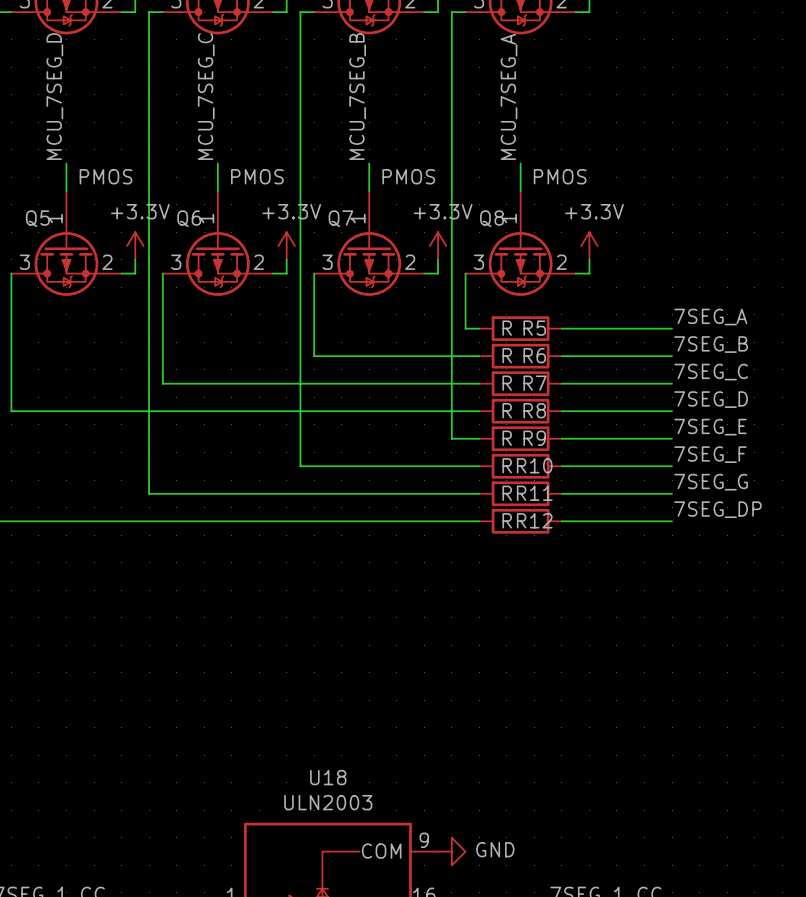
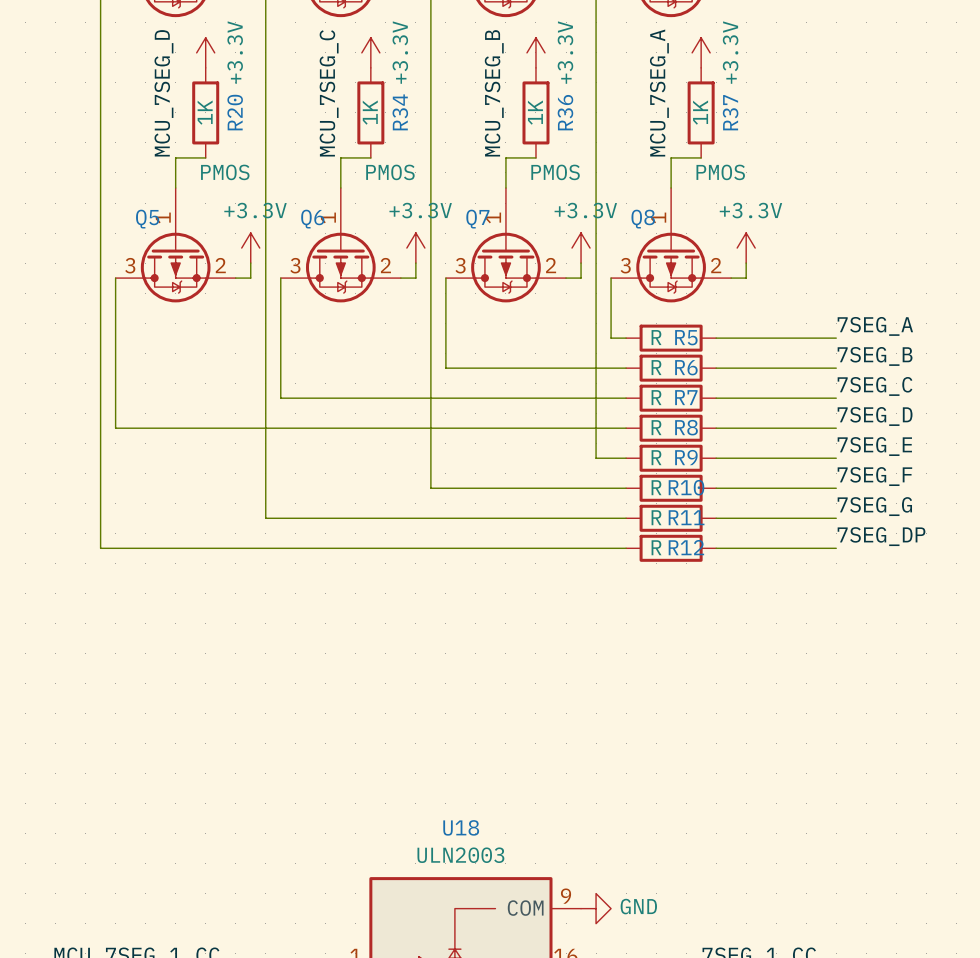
power symbol: none -> +3.3V (205, 52)
power symbol: none -> +3.3V (370, 52)
power symbol: none -> +3.3V (535, 52)
power symbol: none -> +3.3V (701, 52)
R20: none -> 1K (205, 112)
R34: none -> 1K (370, 112)
R36: none -> 1K (535, 112)
R37: none -> 1K (701, 112)
wire: none -> (175, 157) (205, 157)
wire: none -> (340, 157) (370, 157)
wire: none -> (505, 157) (535, 157)
wire: none -> (671, 157) (701, 157)

